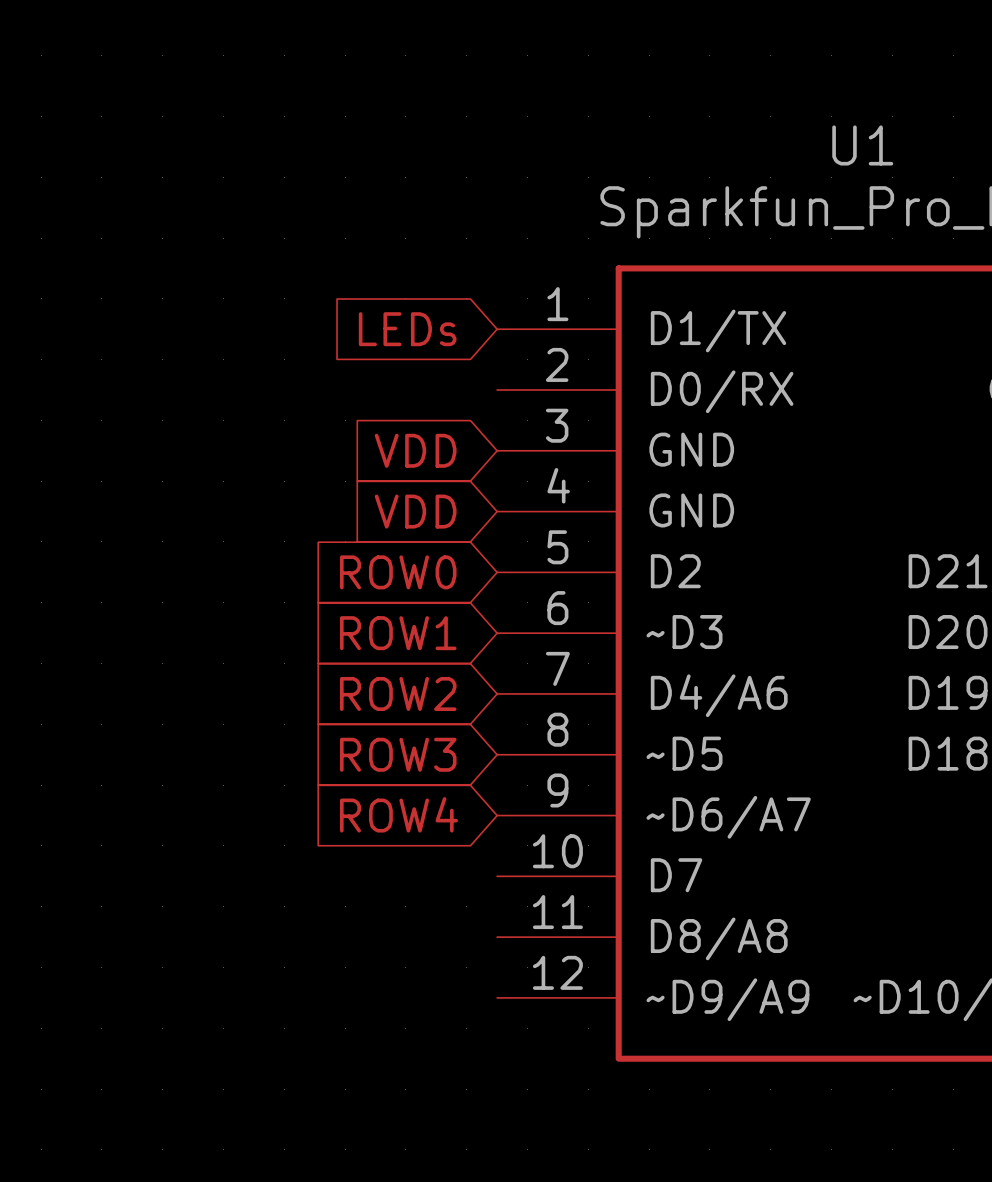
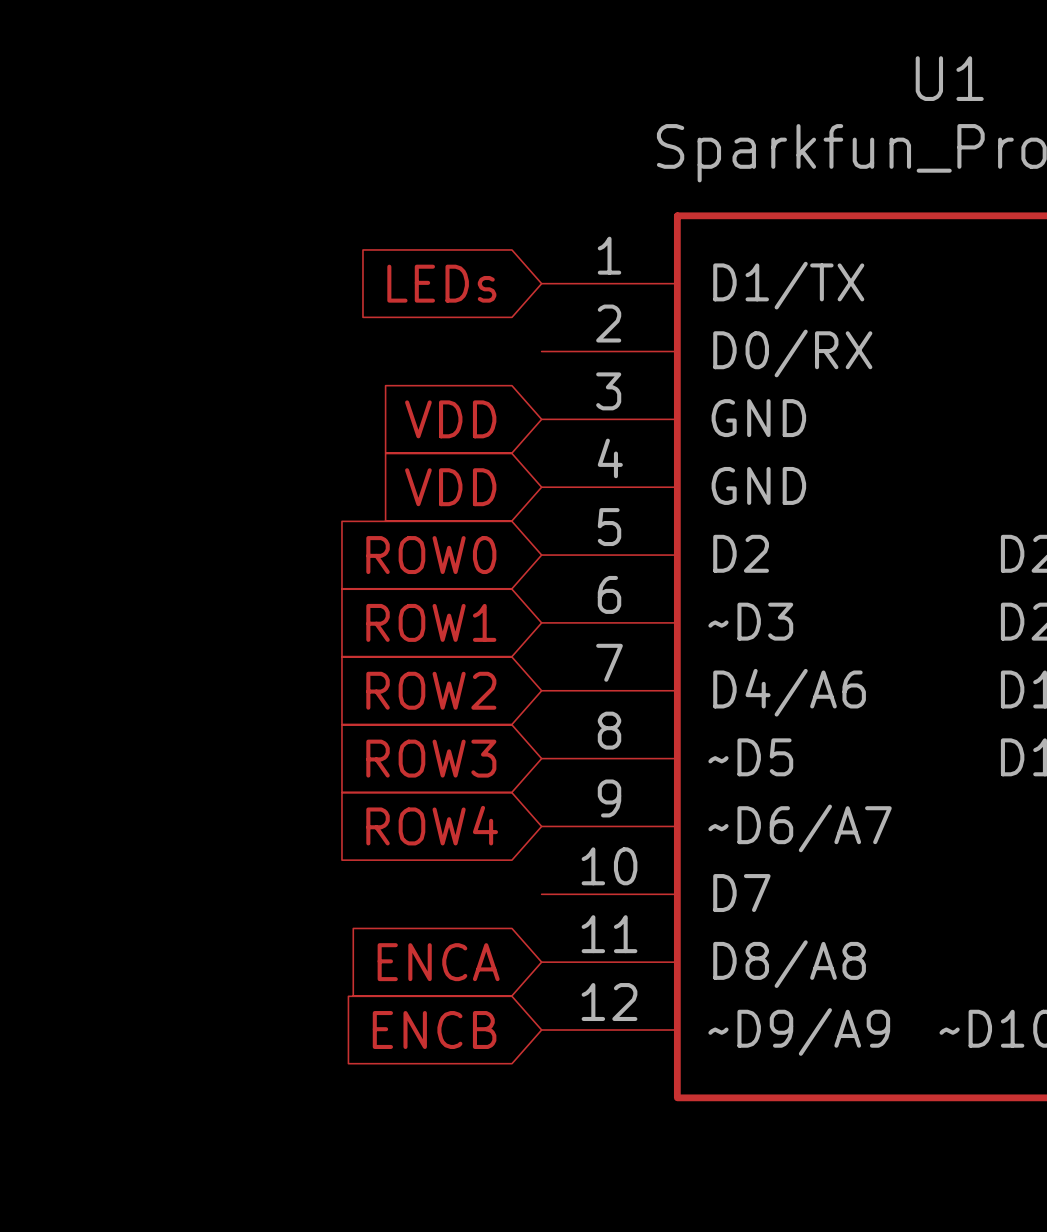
global label: none -> ENCA (438, 962)
global label: none -> ENCB (434, 1030)

